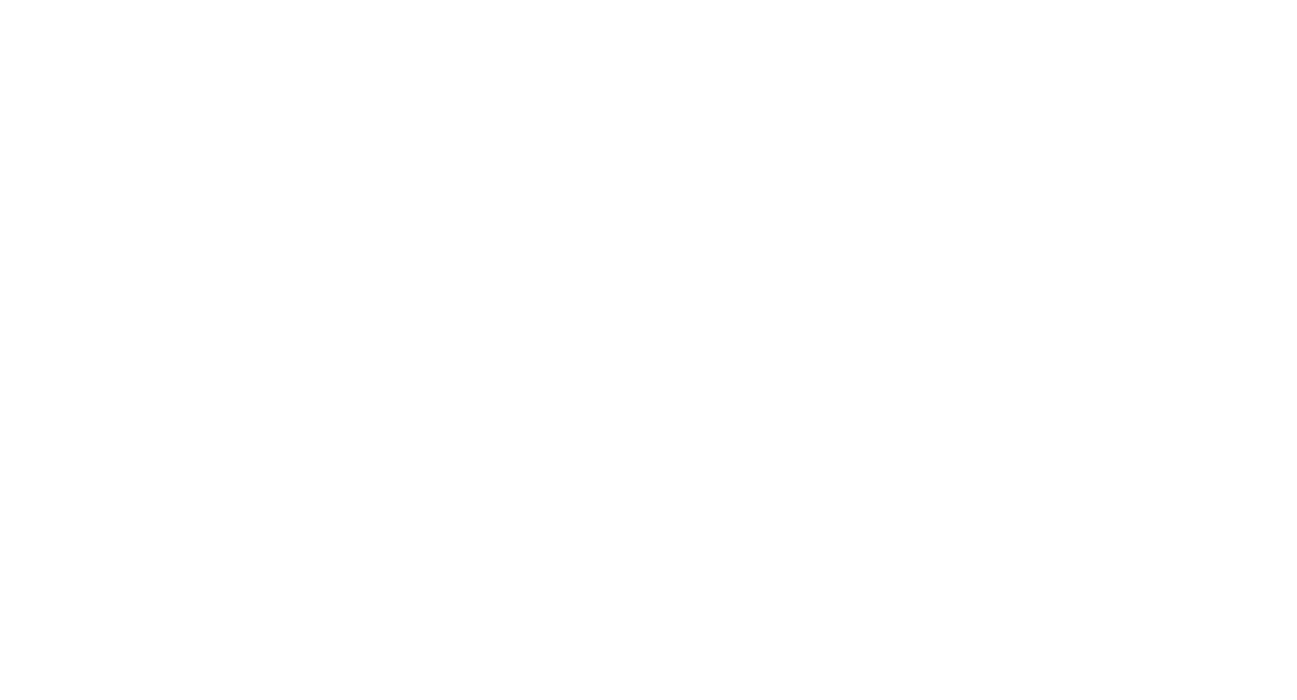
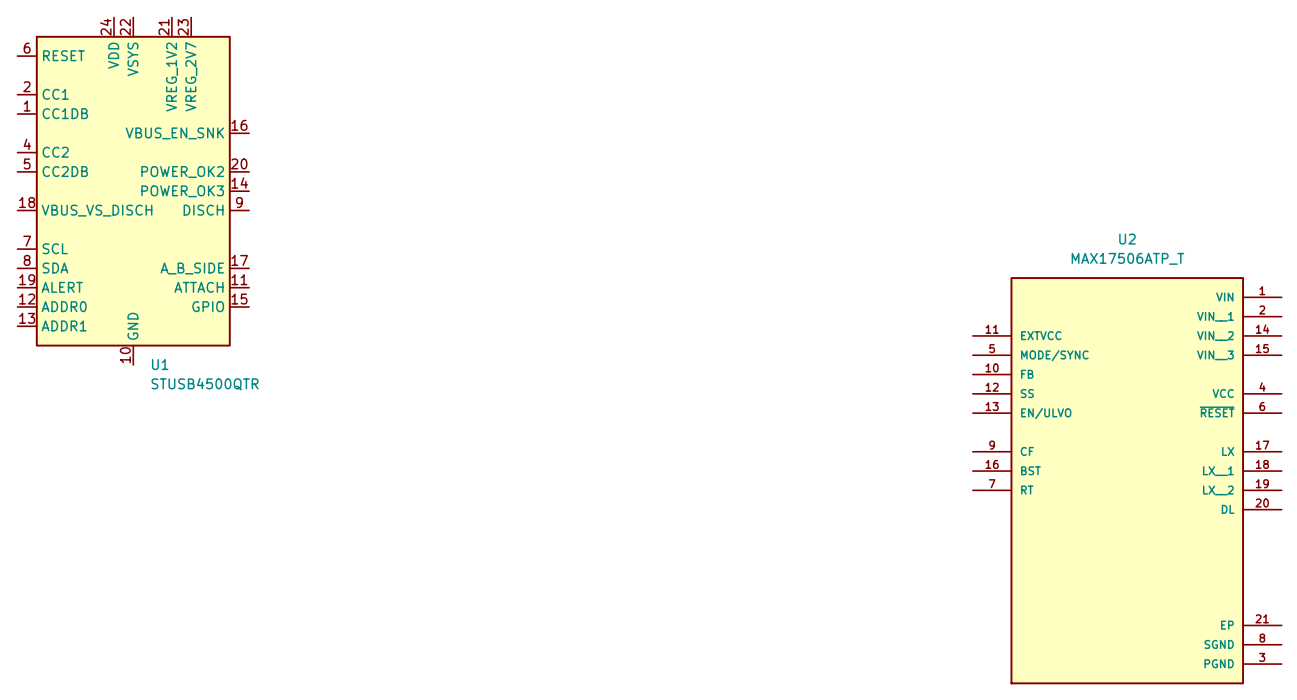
U1: none -> STUSB4500QTR (133, 191)
U2: none -> MAX17506ATP_T (1127, 480)

